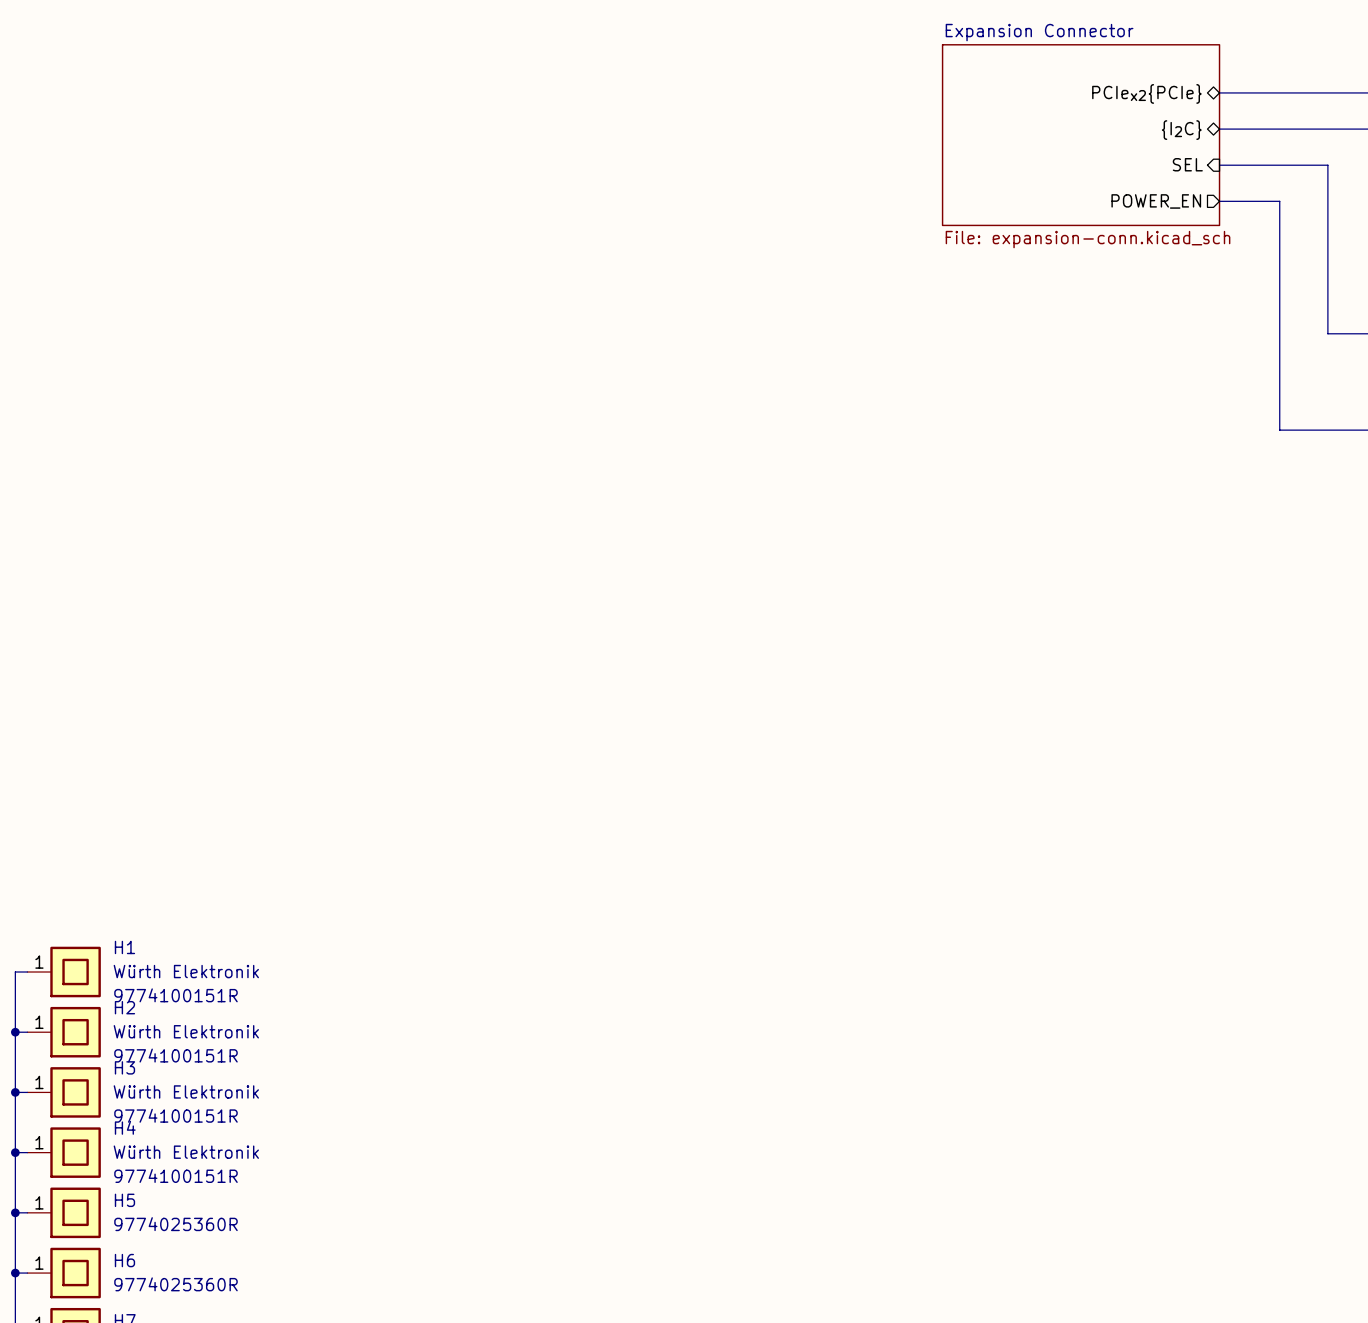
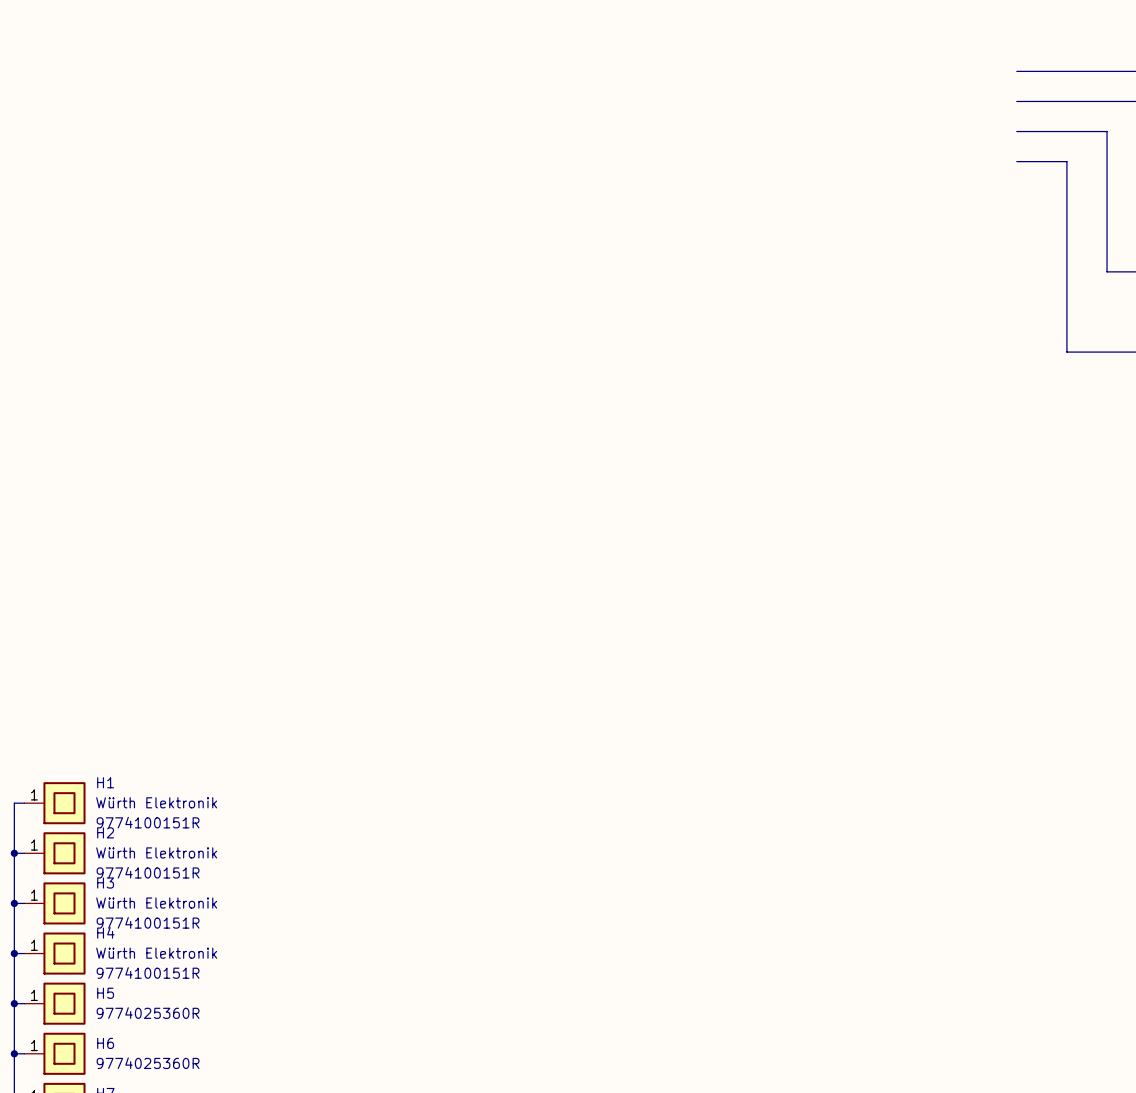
sheet pin: PCIex2{PCIe} (1146, 93) -> none
sheet pin: {I2C} (1181, 130) -> none
sheet Expansion Connector: File: expansion-conn.kicad_sch (1081, 135) -> none
sheet pin: SEL (1187, 164) -> none
sheet pin: POWER_EN (1156, 201) -> none

